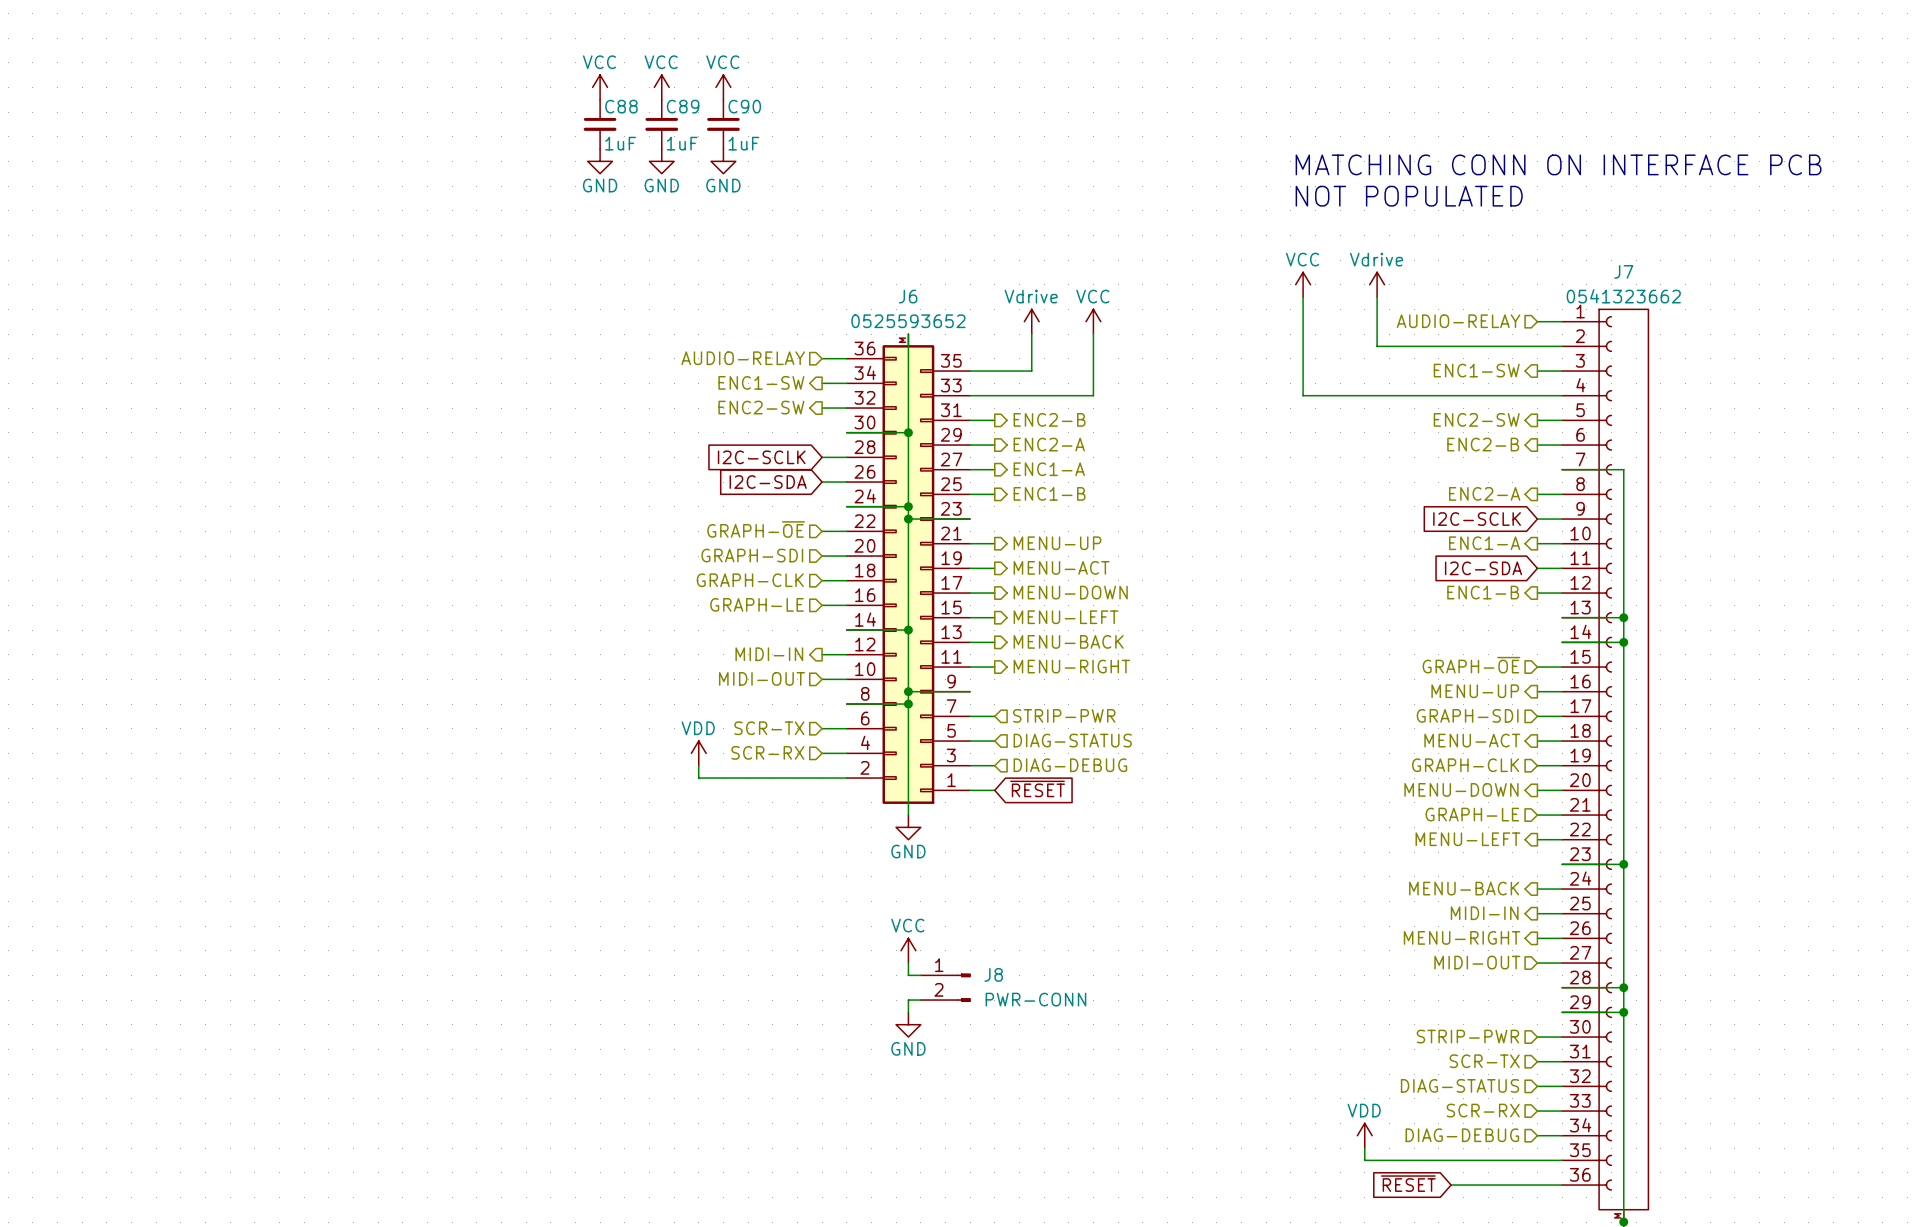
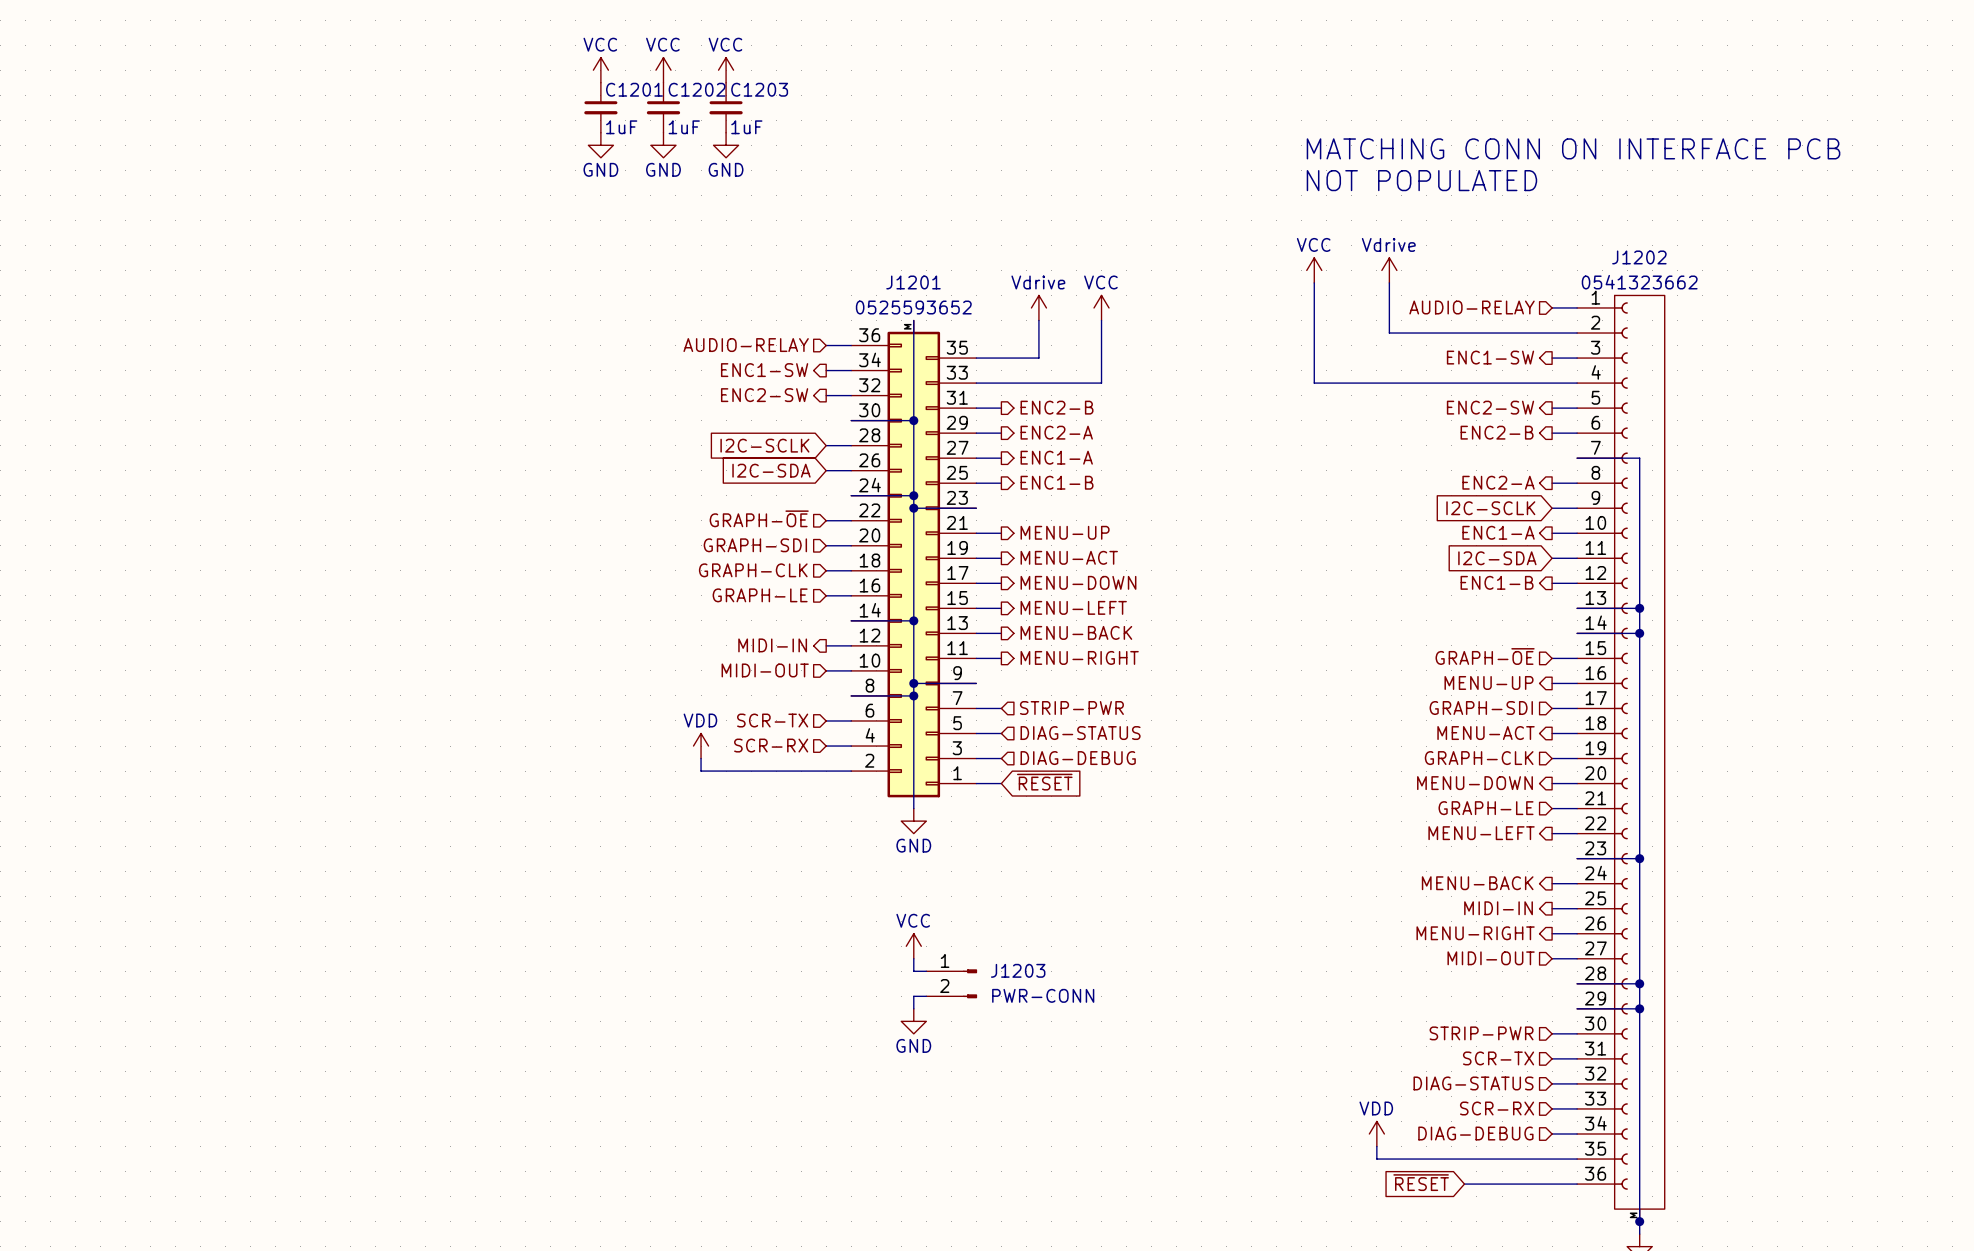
C88 name: C88 (621, 106) -> C1201 (634, 89)
C89 name: C89 (683, 106) -> C1202 (697, 89)
C90 name: C90 (744, 106) -> C1203 (759, 89)
J7 name: J7 (1623, 271) -> J1202 (1639, 257)
J6 name: J6 (908, 296) -> J1201 (913, 282)
J8 name: J8 (993, 974) -> J1203 (1018, 970)

